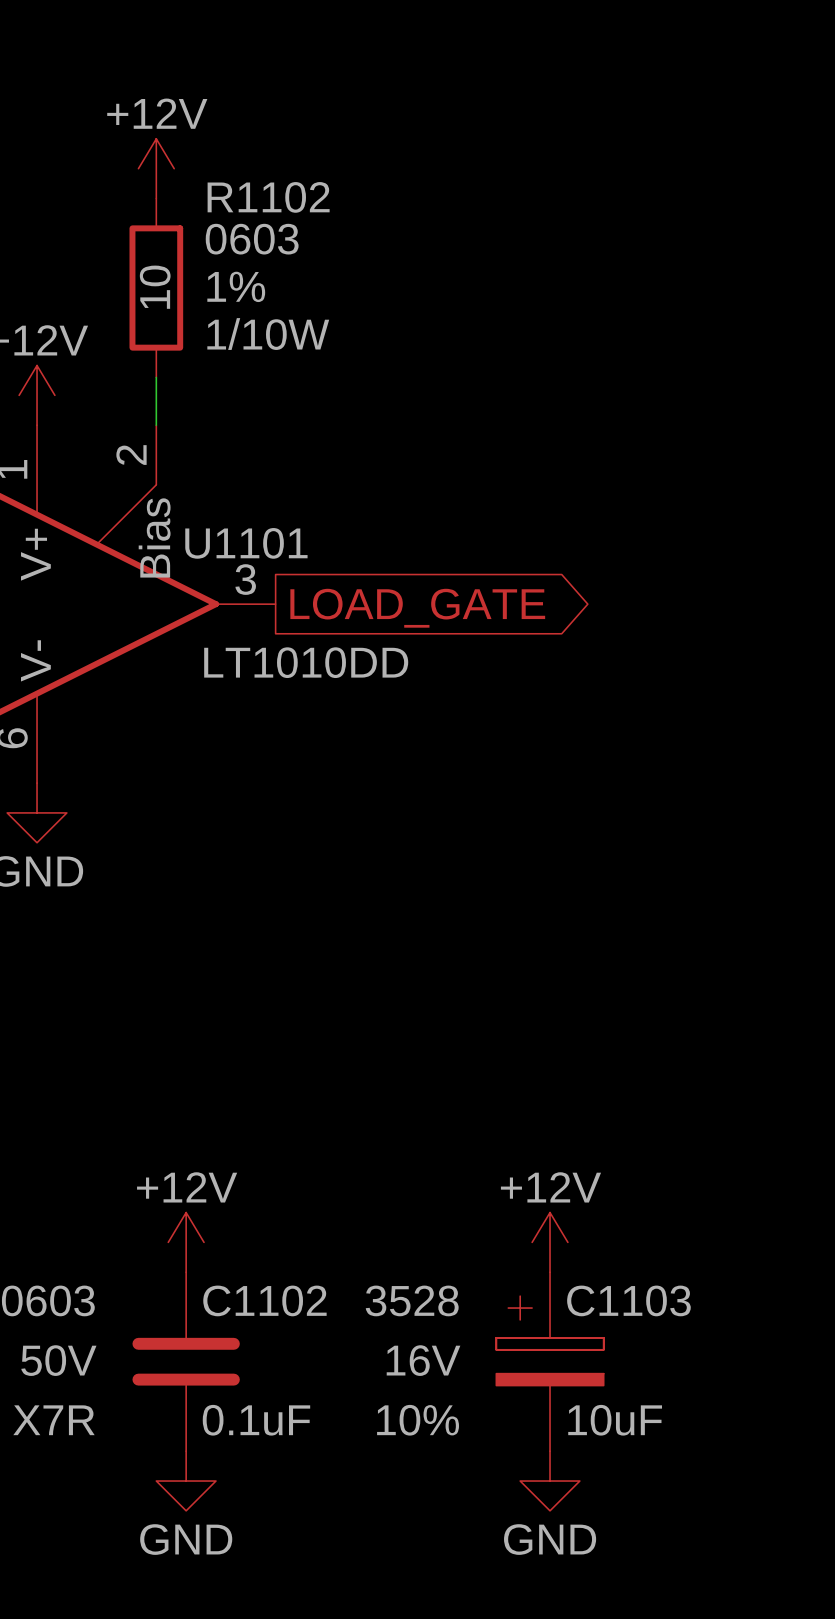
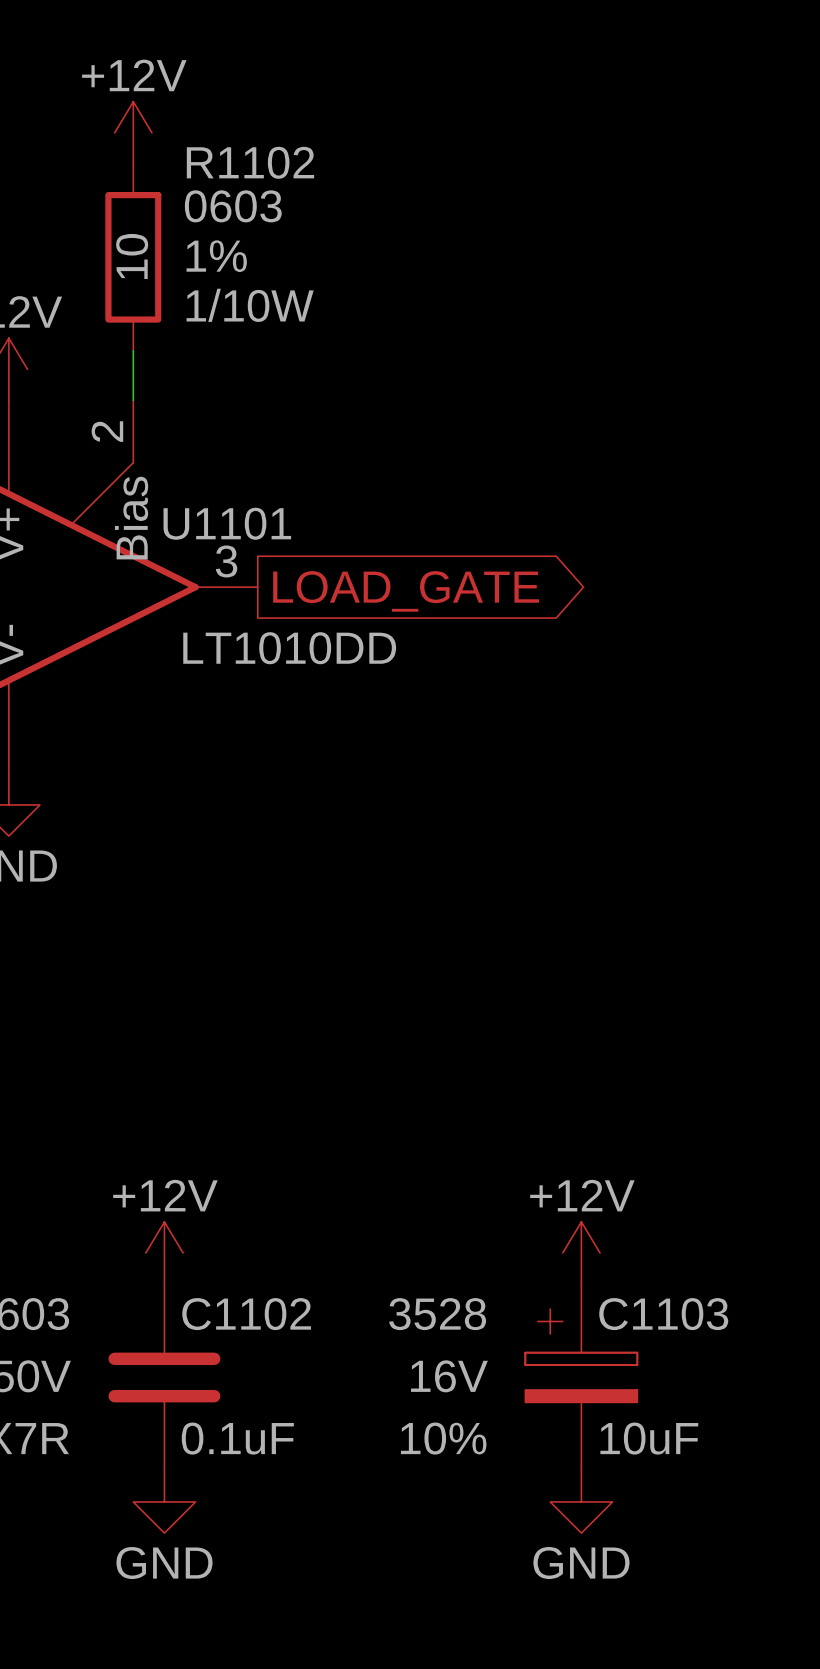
power symbol position: +12V (550, 1242) -> +12V (581, 1253)
C1103 position: (550, 1361) -> (581, 1377)
power symbol position: GND (550, 1481) -> GND (581, 1501)

